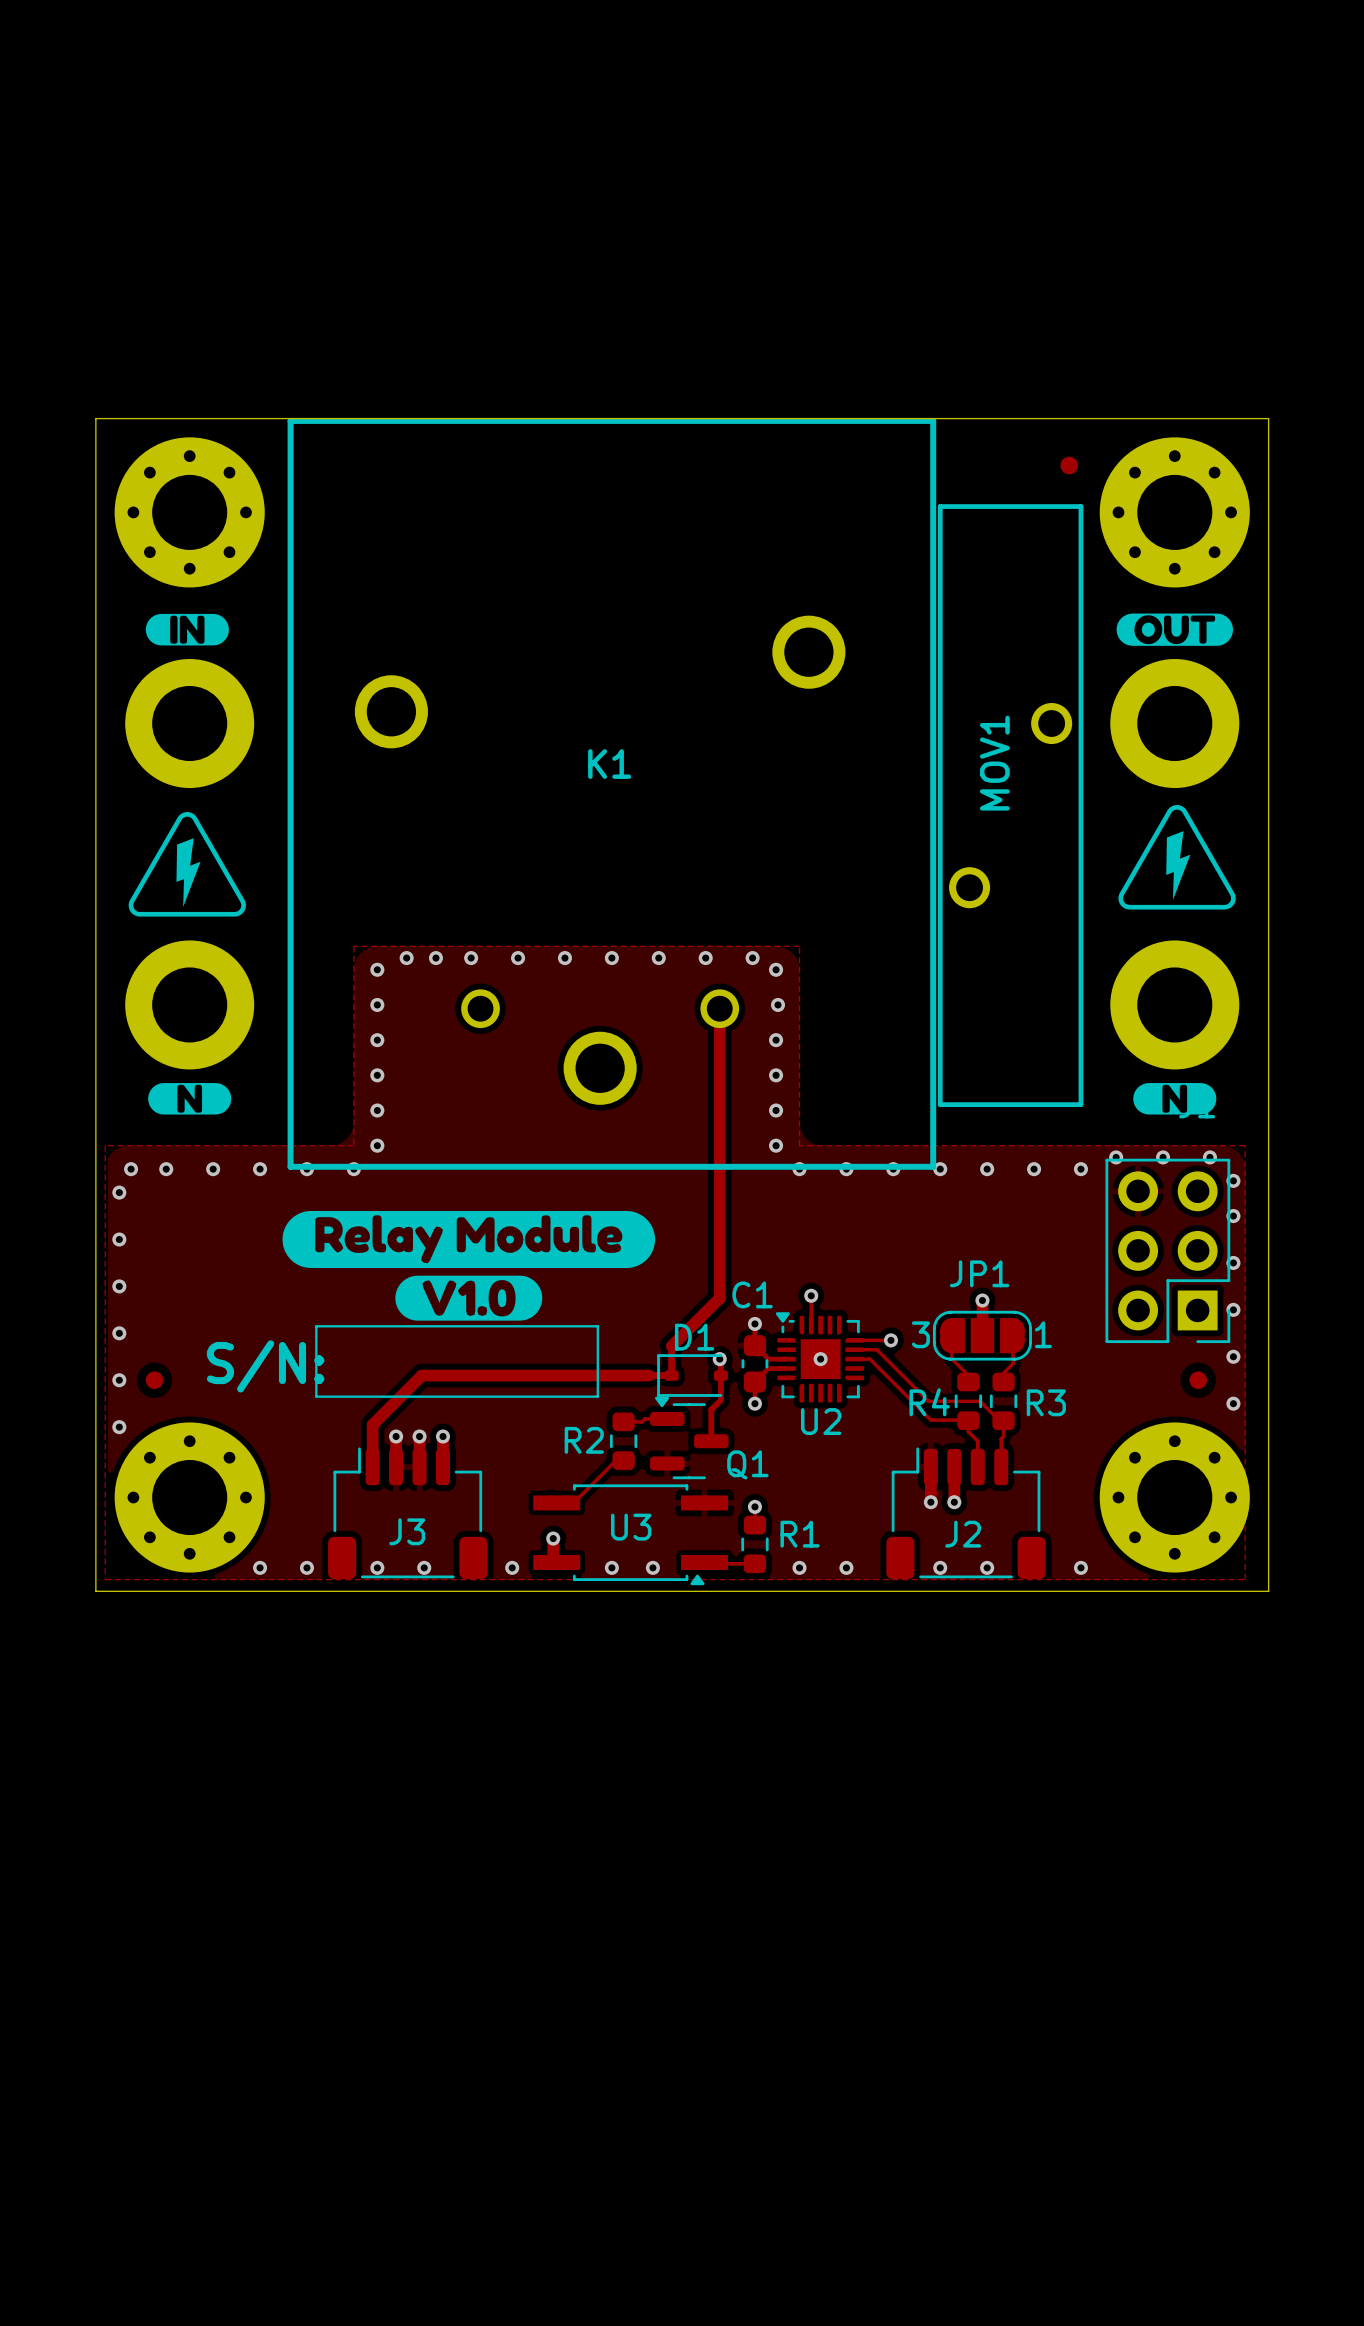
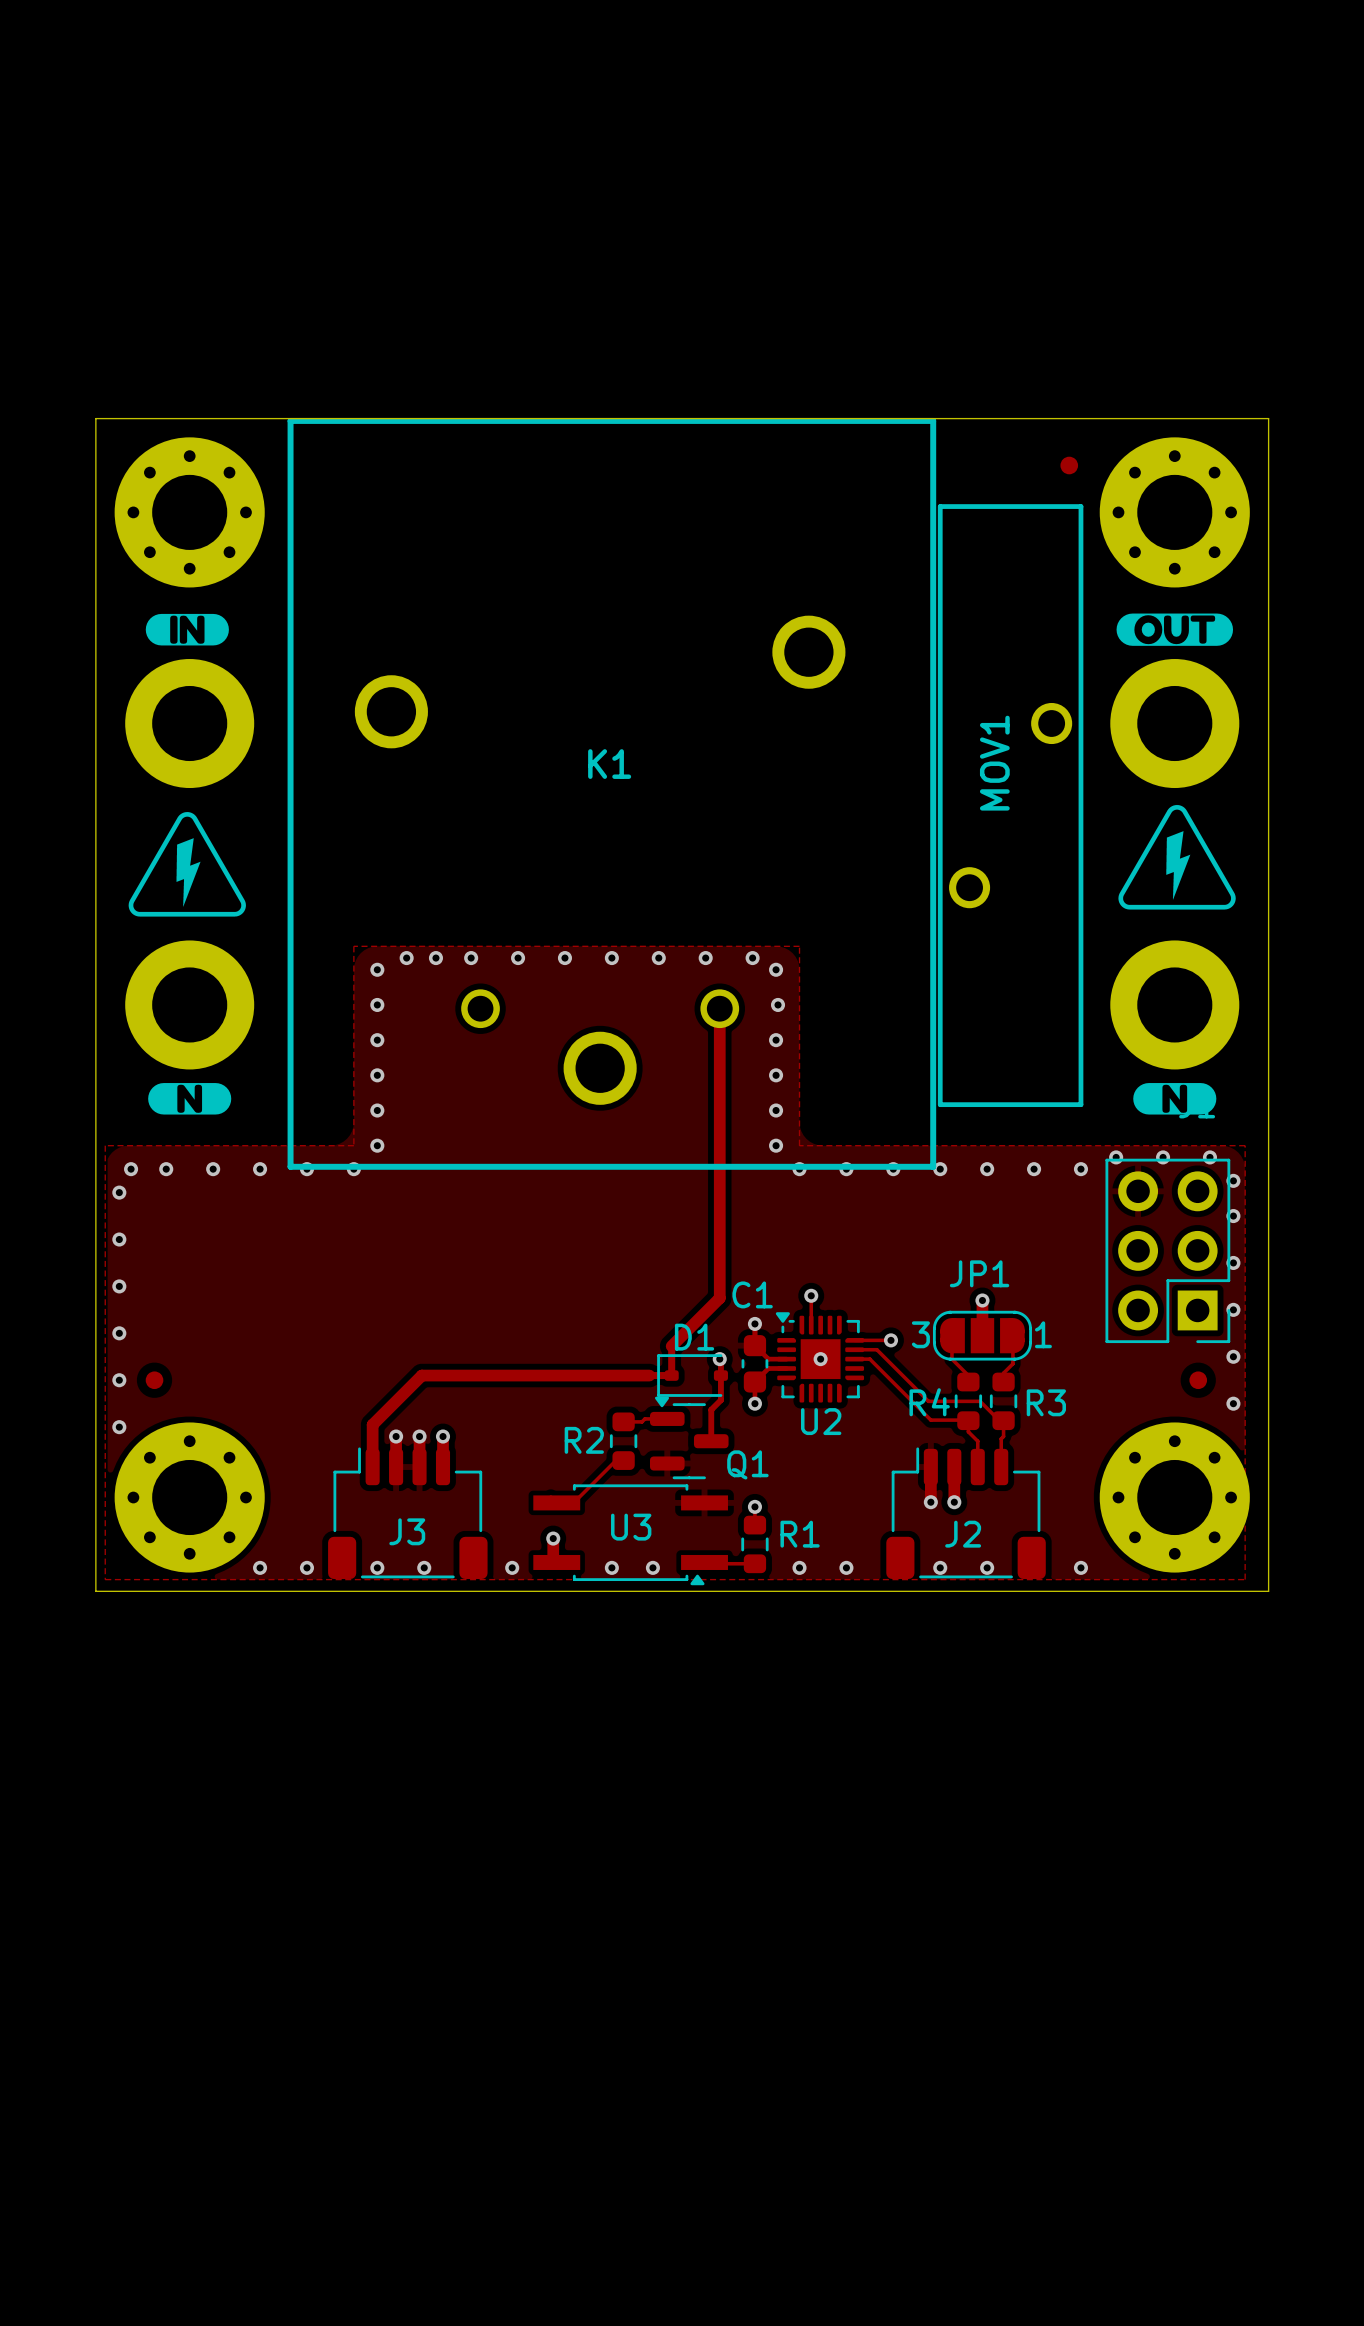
drawing: [282, 1211, 656, 1321] -> none
line: (316, 1326) (597, 1326) (597, 1396) (316, 1396) (316, 1326) -> none
text: S/N: (265, 1366) -> none

